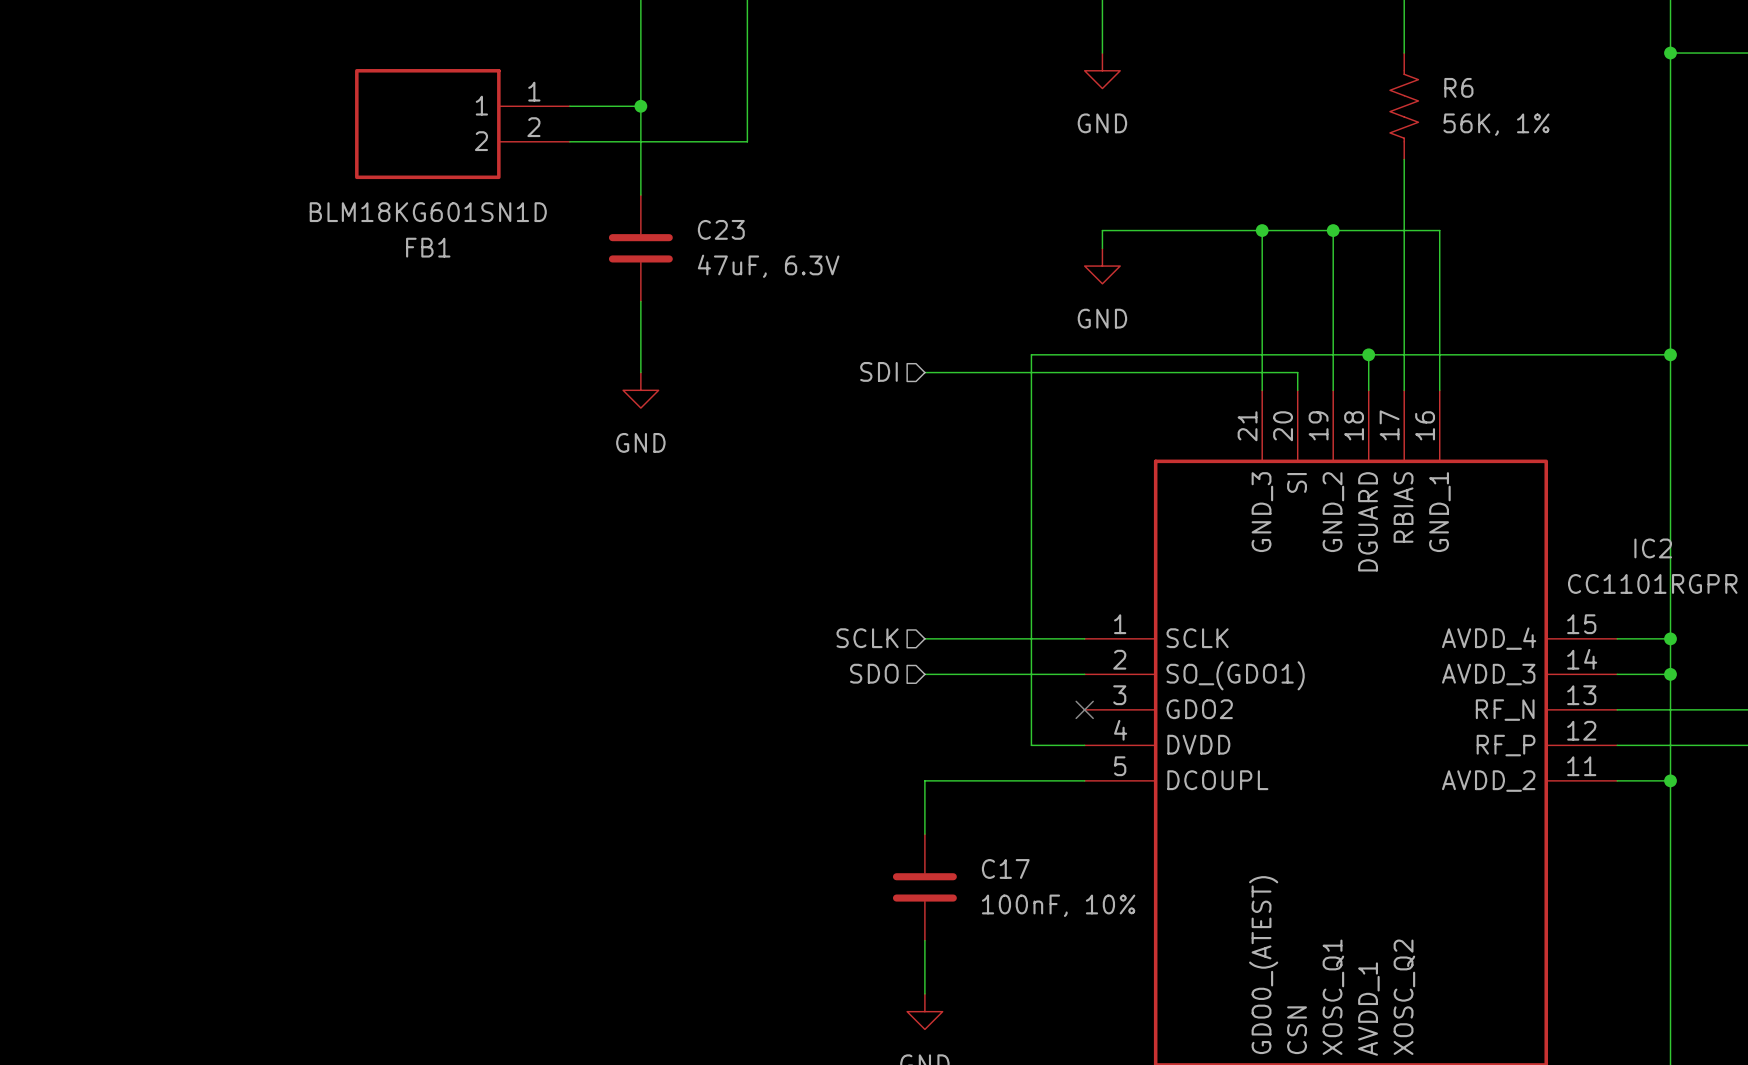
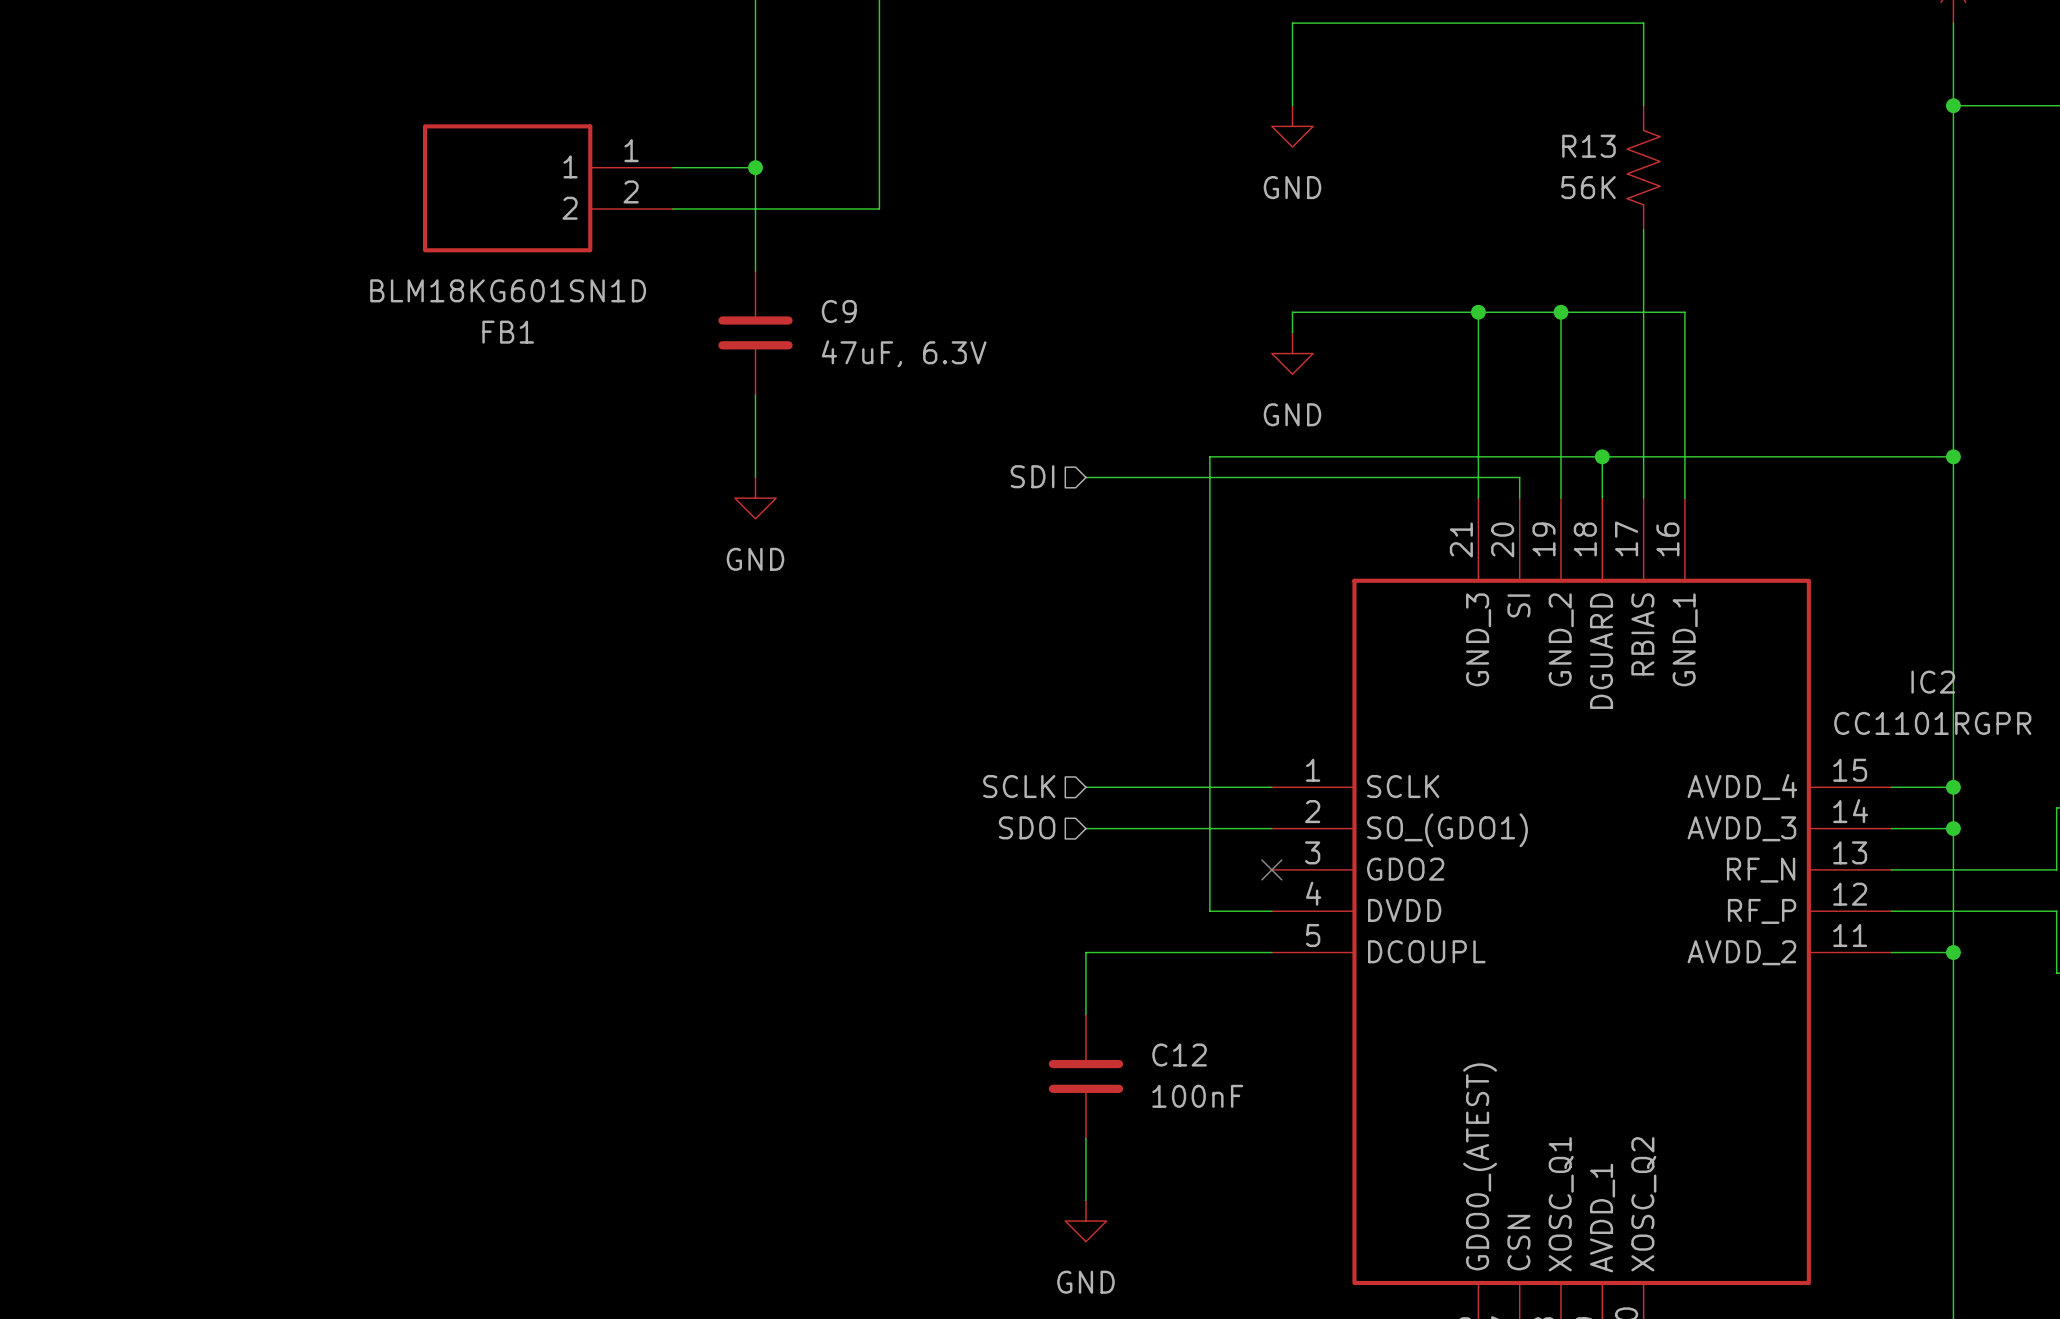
R6 name: R6 (1458, 87) -> R13 (1588, 146)
R6 value: 56K, 1% (1496, 124) -> 56K (1588, 187)
C23 name: C23 (721, 229) -> C9 (839, 311)
C17 name: C17 (1005, 868) -> C12 (1179, 1055)
C17 value: 100nF, 10% (1058, 905) -> 100nF (1197, 1096)

